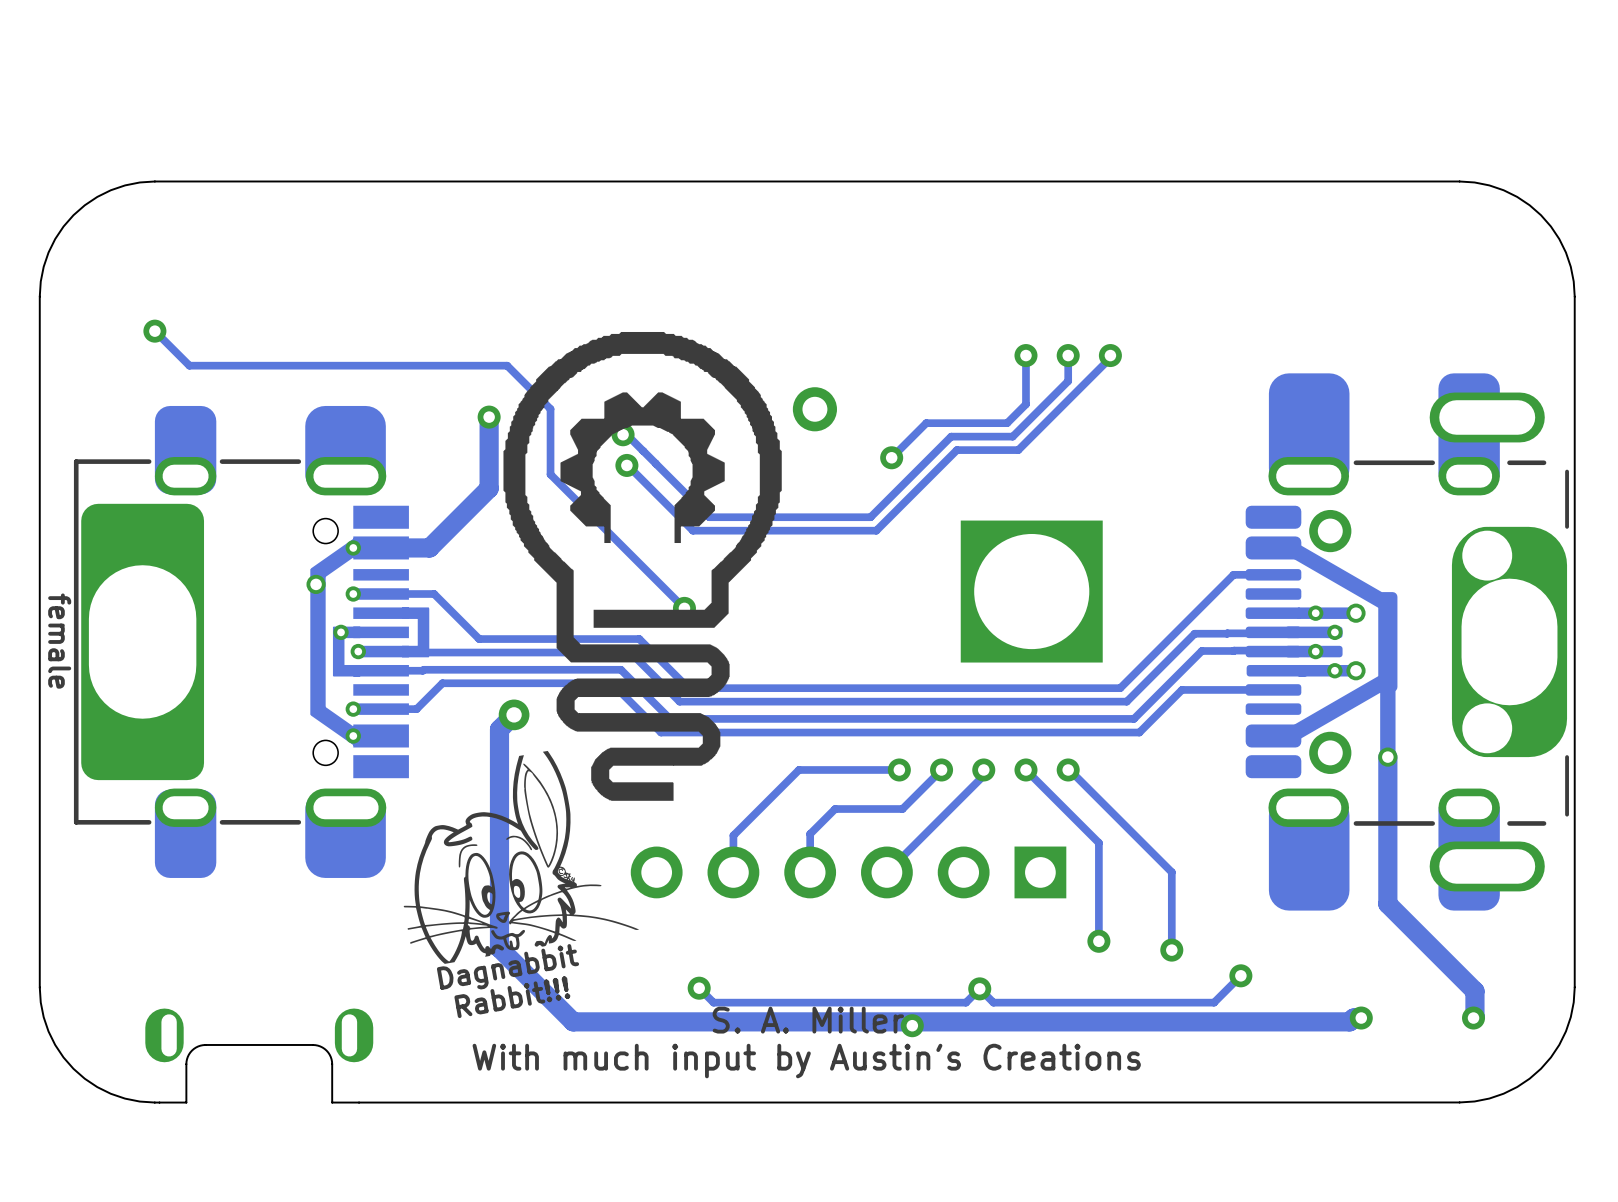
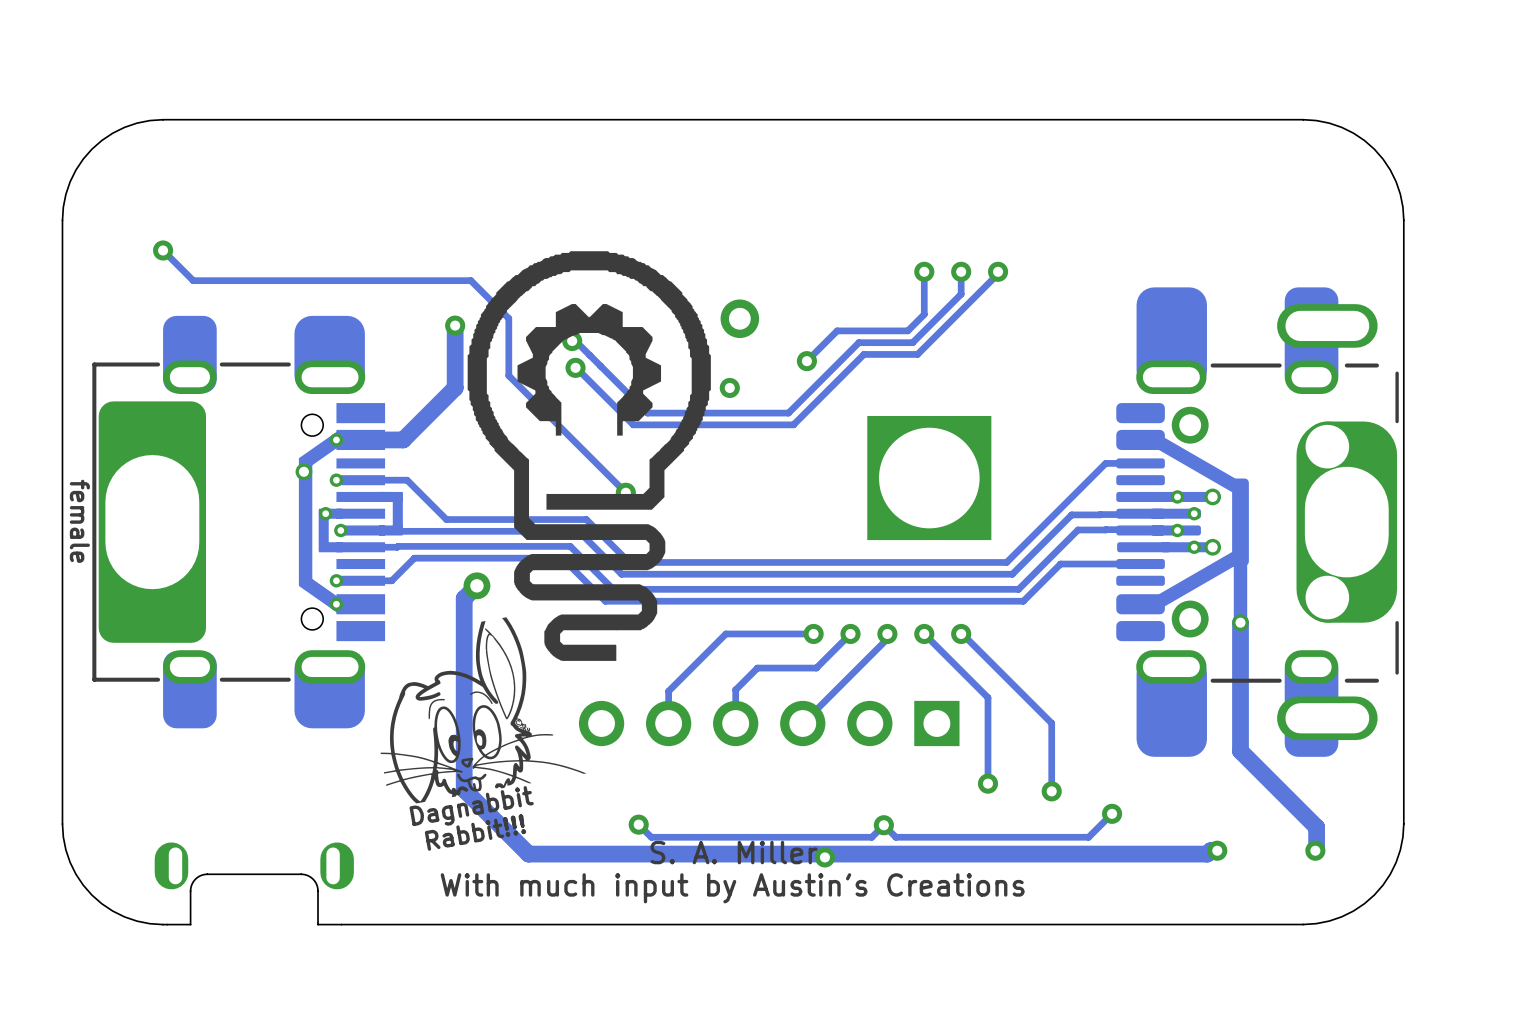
via: none -> (729, 387)

